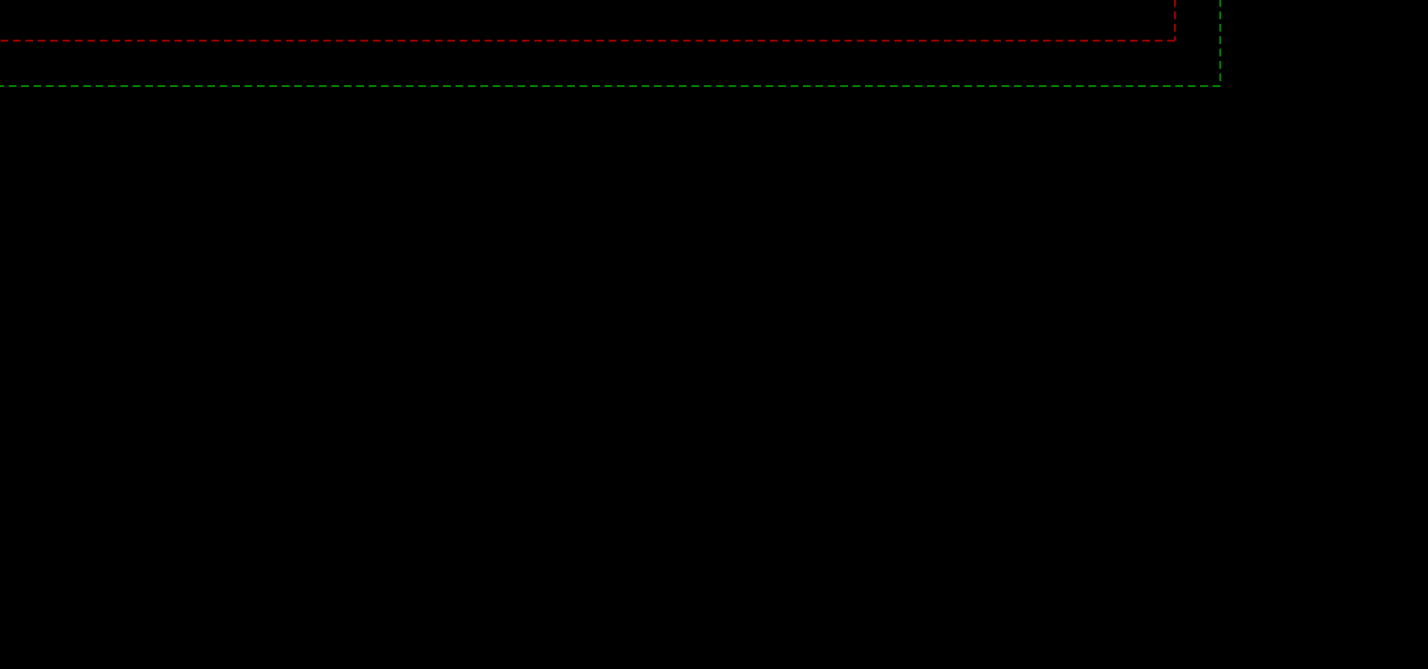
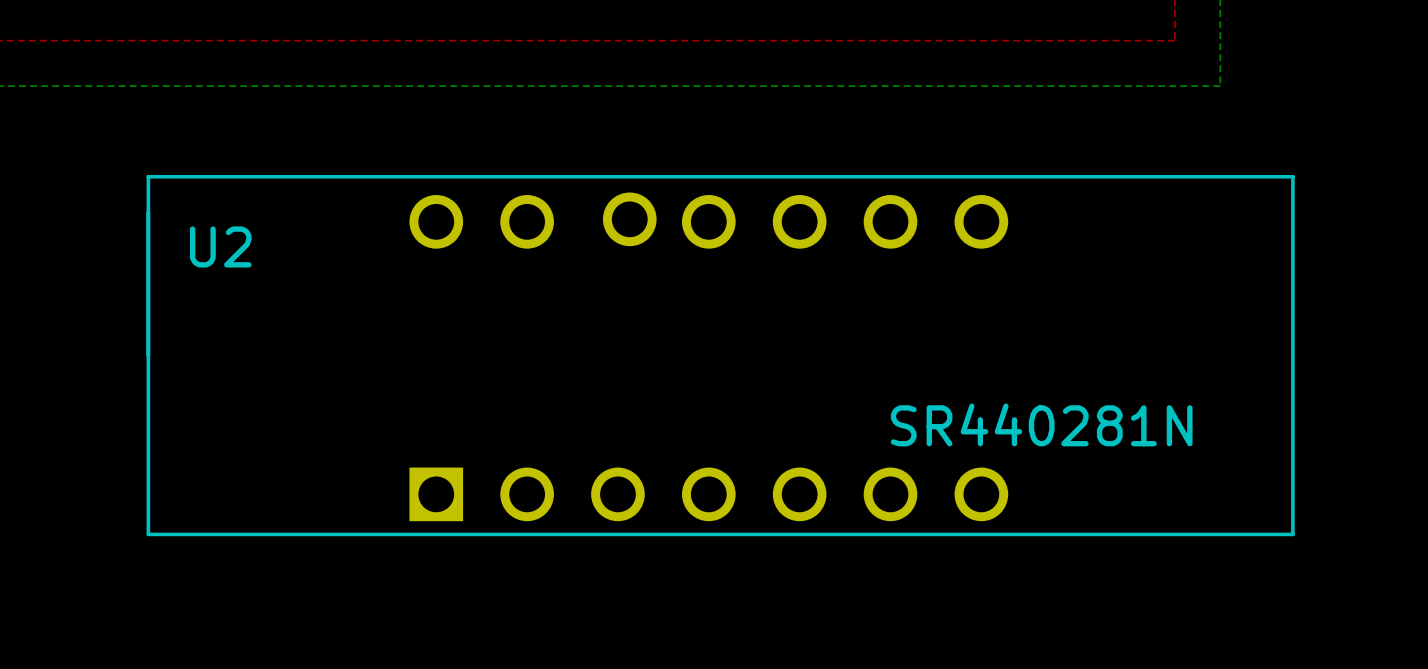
U2: none -> SR440281N (720, 355)

